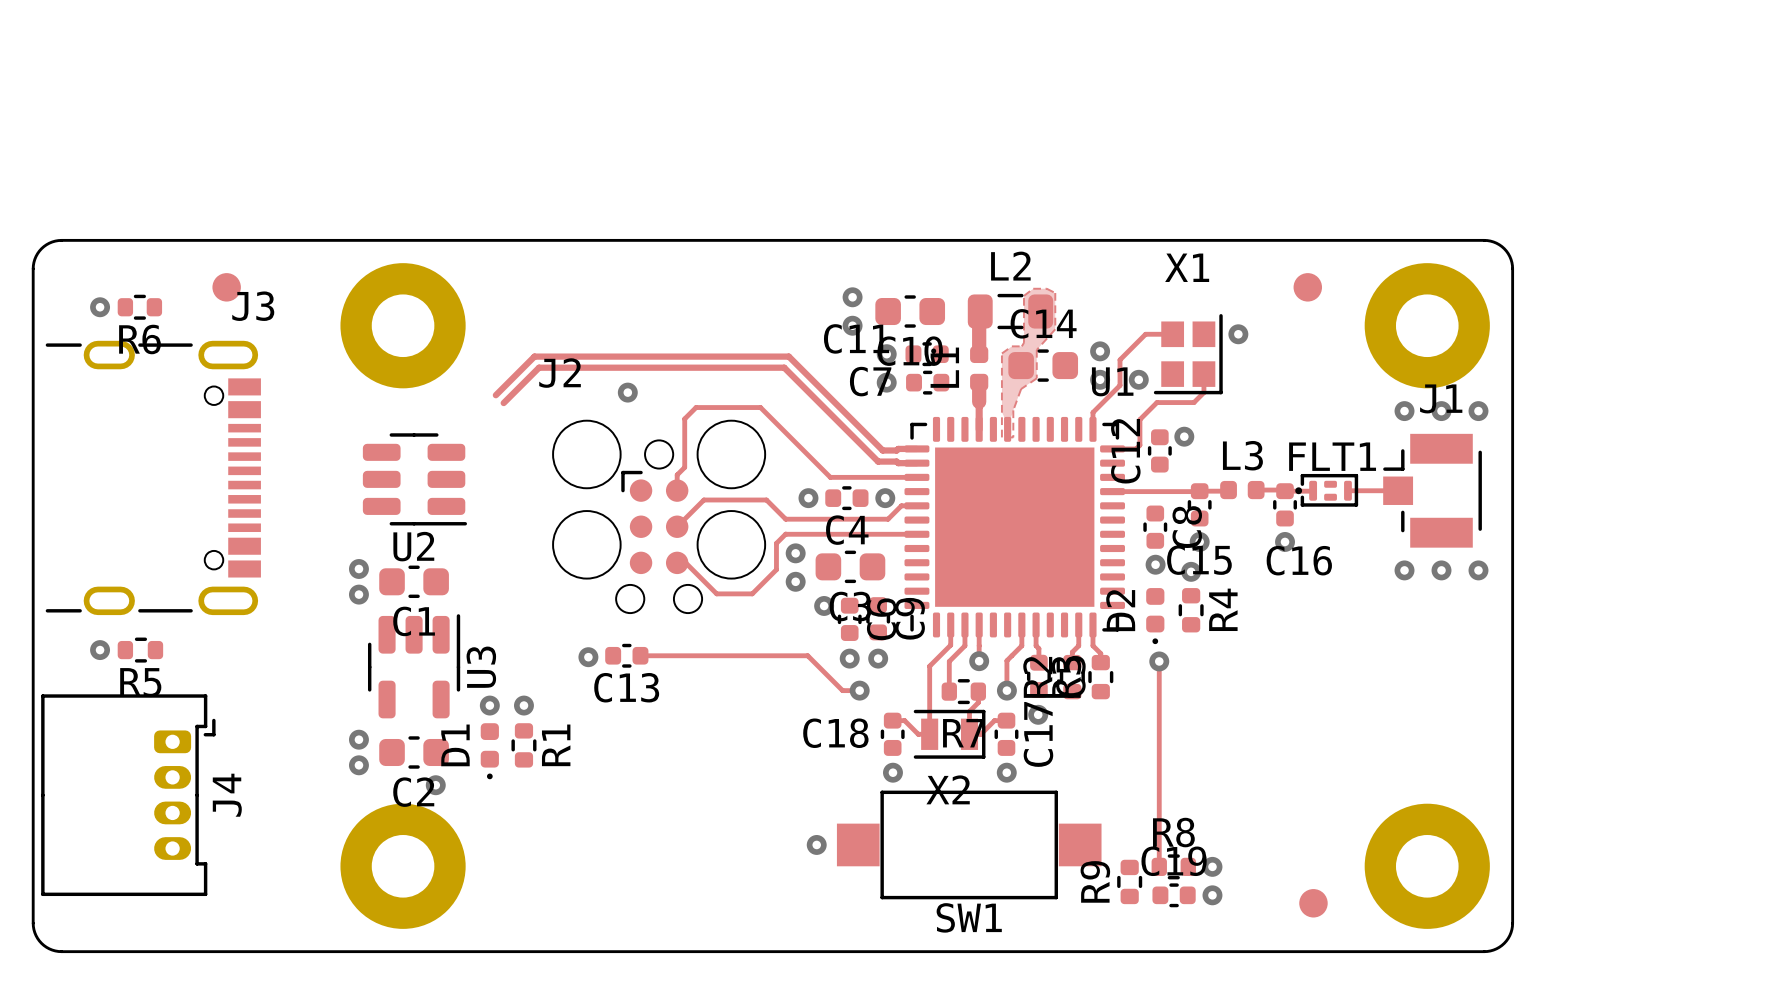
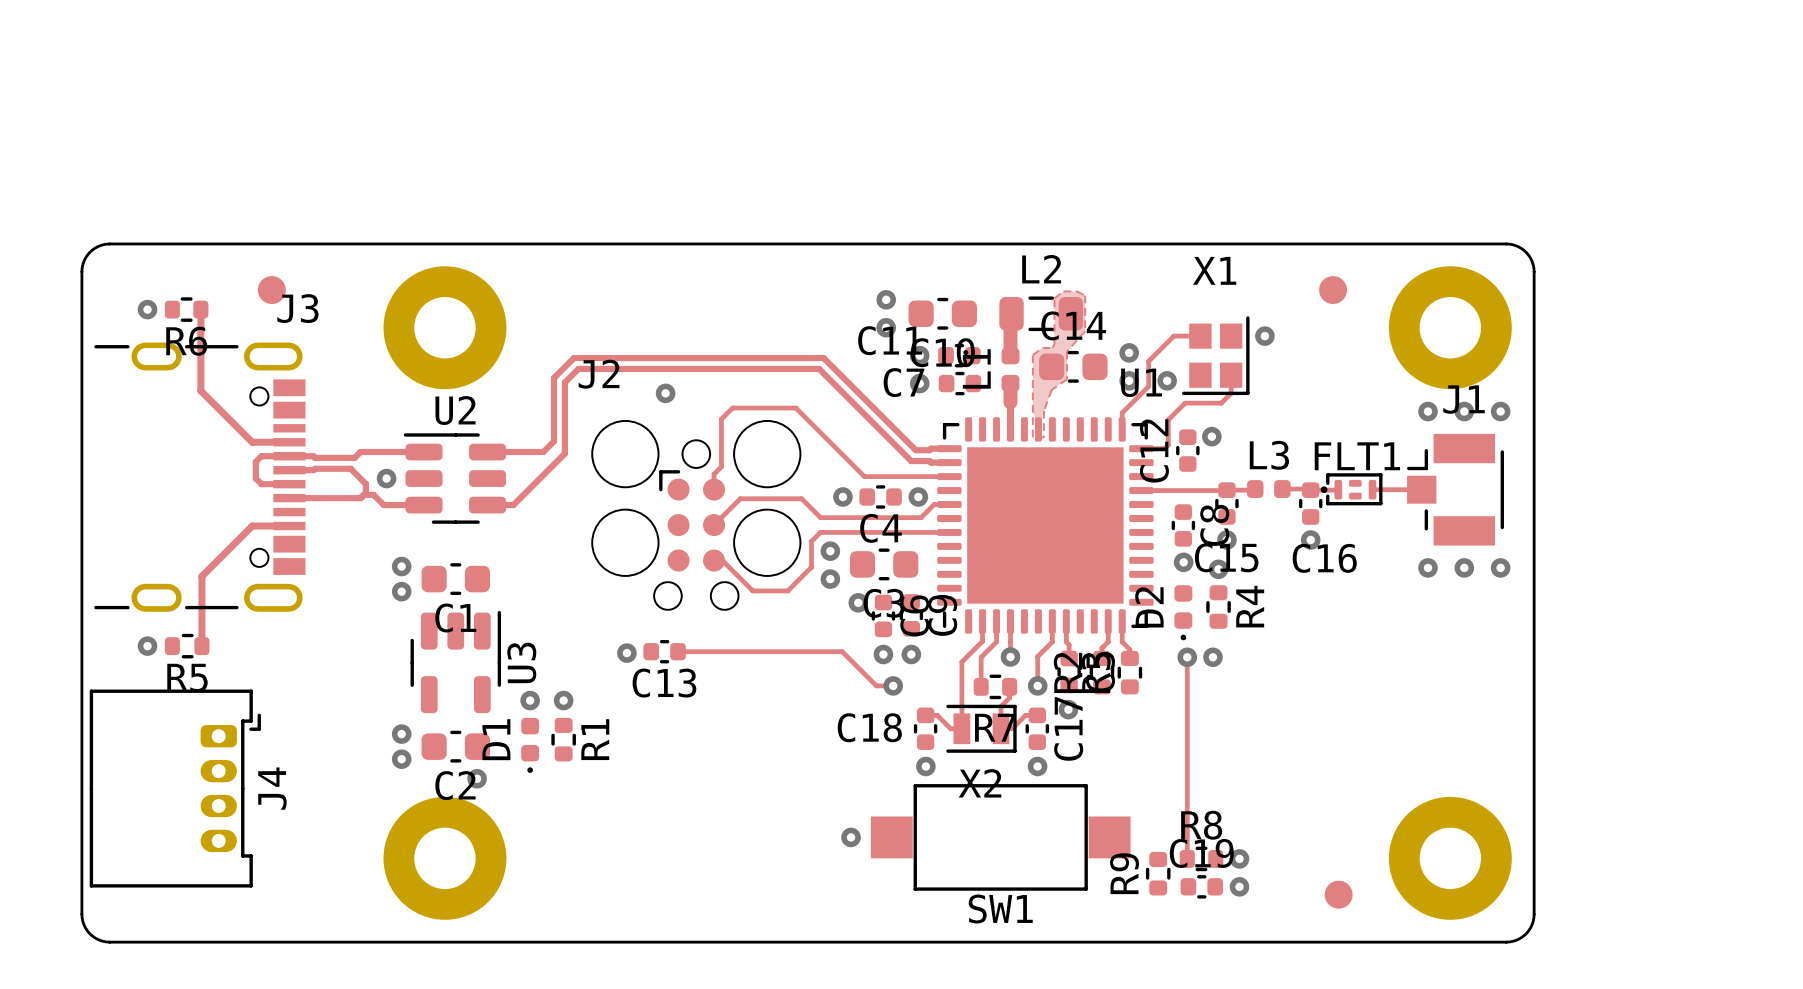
track: none -> (200, 309) (200, 390) (252, 442) (289, 442)
track: (514, 376) (495, 395) -> (554, 377) (554, 441) (543, 452) (487, 452)
track: (525, 381) (503, 403) -> (564, 382) (564, 453) (513, 505) (487, 505)
track: none -> (424, 452) (360, 452) (354, 457) (261, 456) (255, 461) (255, 478) (261, 484) (289, 484)
track: none -> (289, 470) (350, 468) (365, 483) (365, 492) (360, 498) (289, 498)
via: none -> (386, 478)
U2 rotation: 0° (414, 479) -> 180° (454, 478)
track: none -> (363, 494) (373, 494) (383, 505) (424, 505)
track: none -> (289, 526) (252, 526) (201, 576) (201, 646)
via: none -> (1212, 657)

